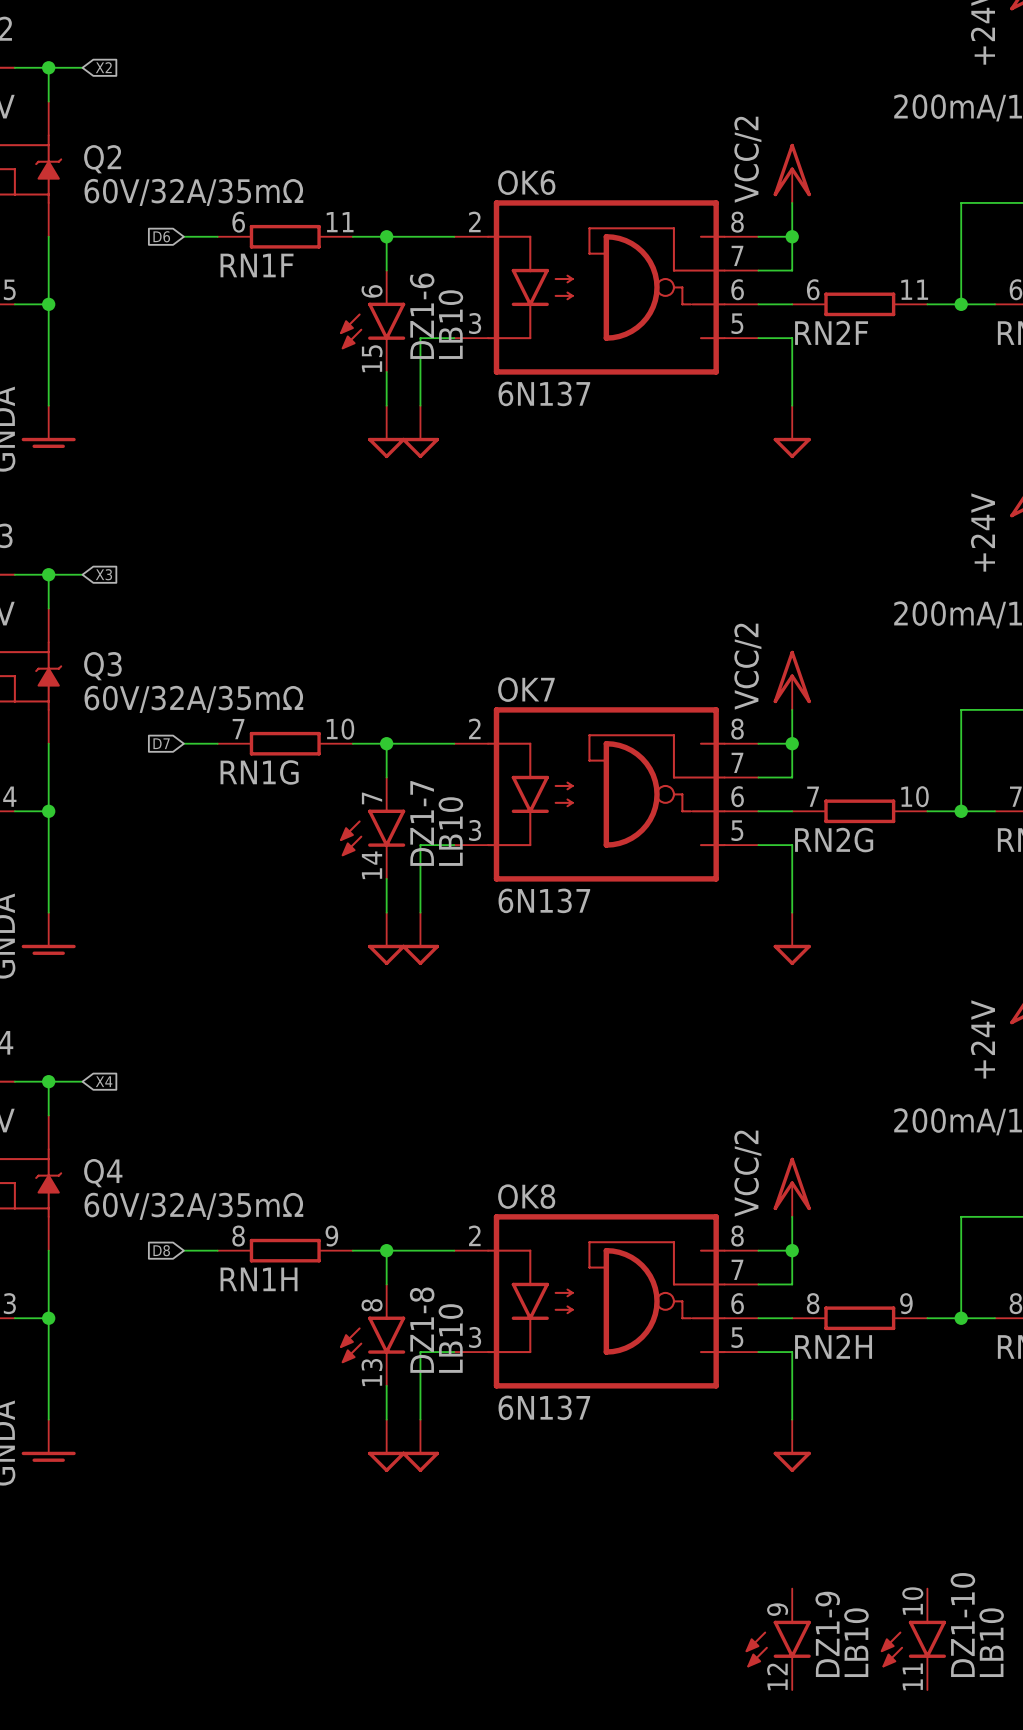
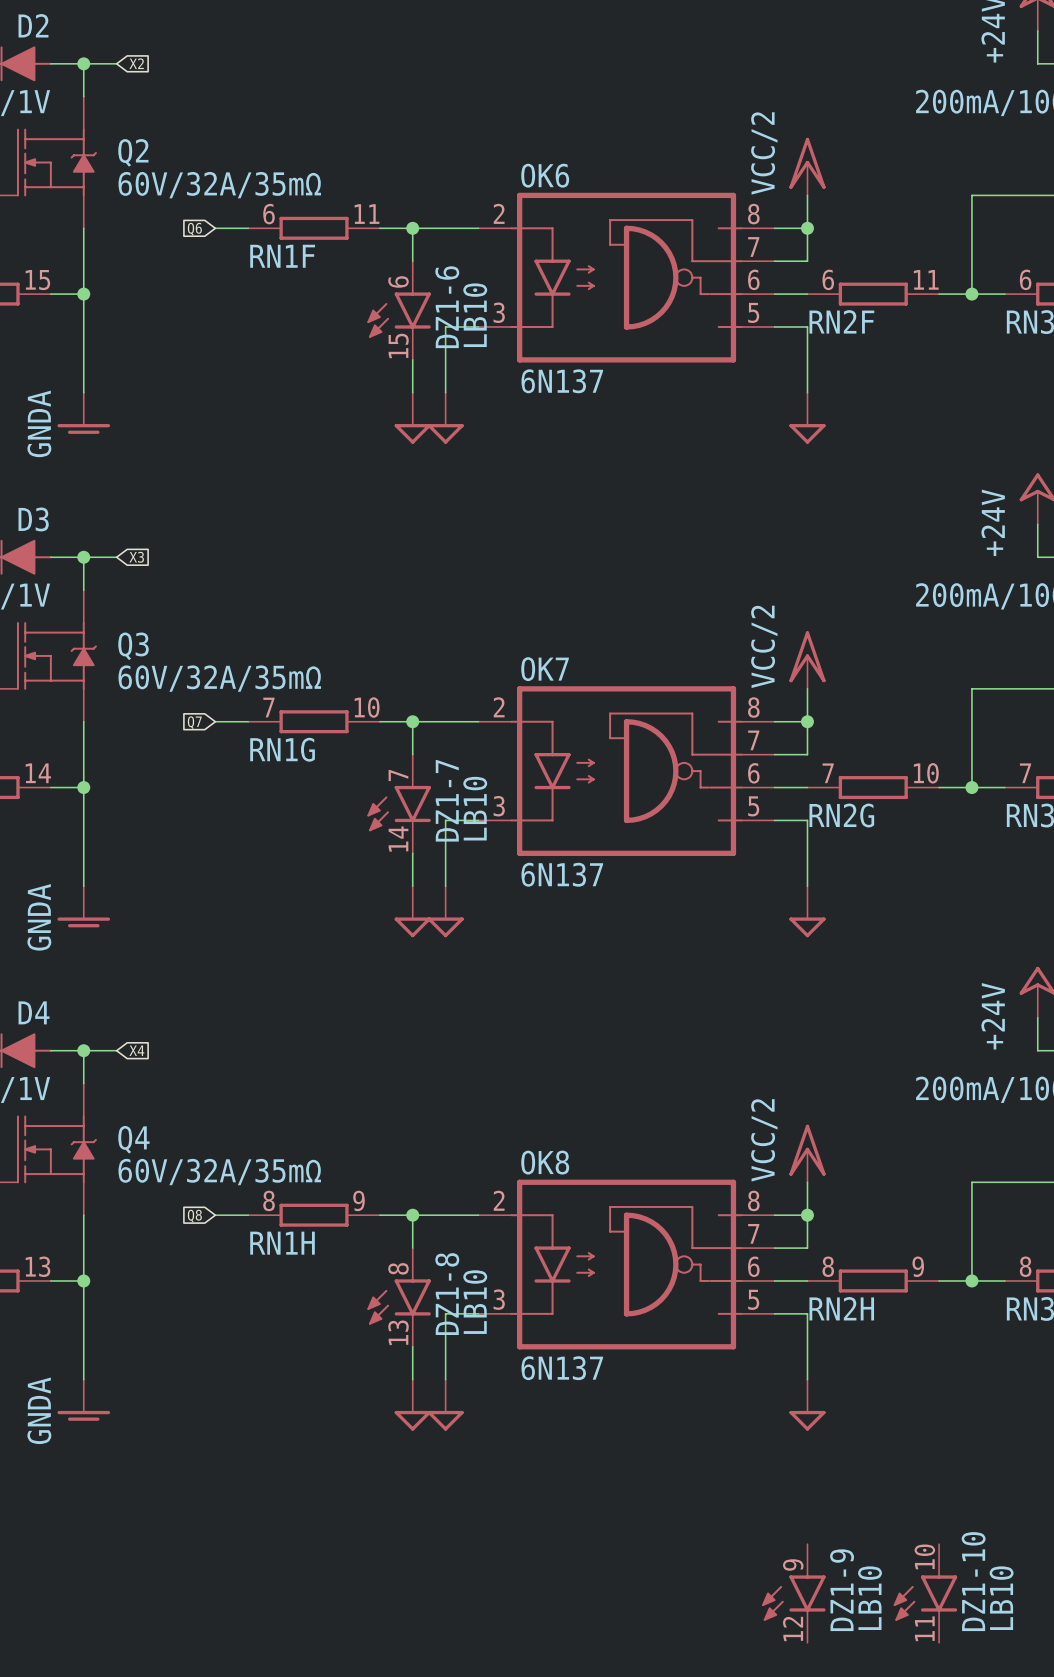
global label: D6 (161, 236) -> Q6 (194, 229)
global label: D7 (161, 743) -> Q7 (194, 722)
global label: D8 (161, 1250) -> Q8 (194, 1216)

